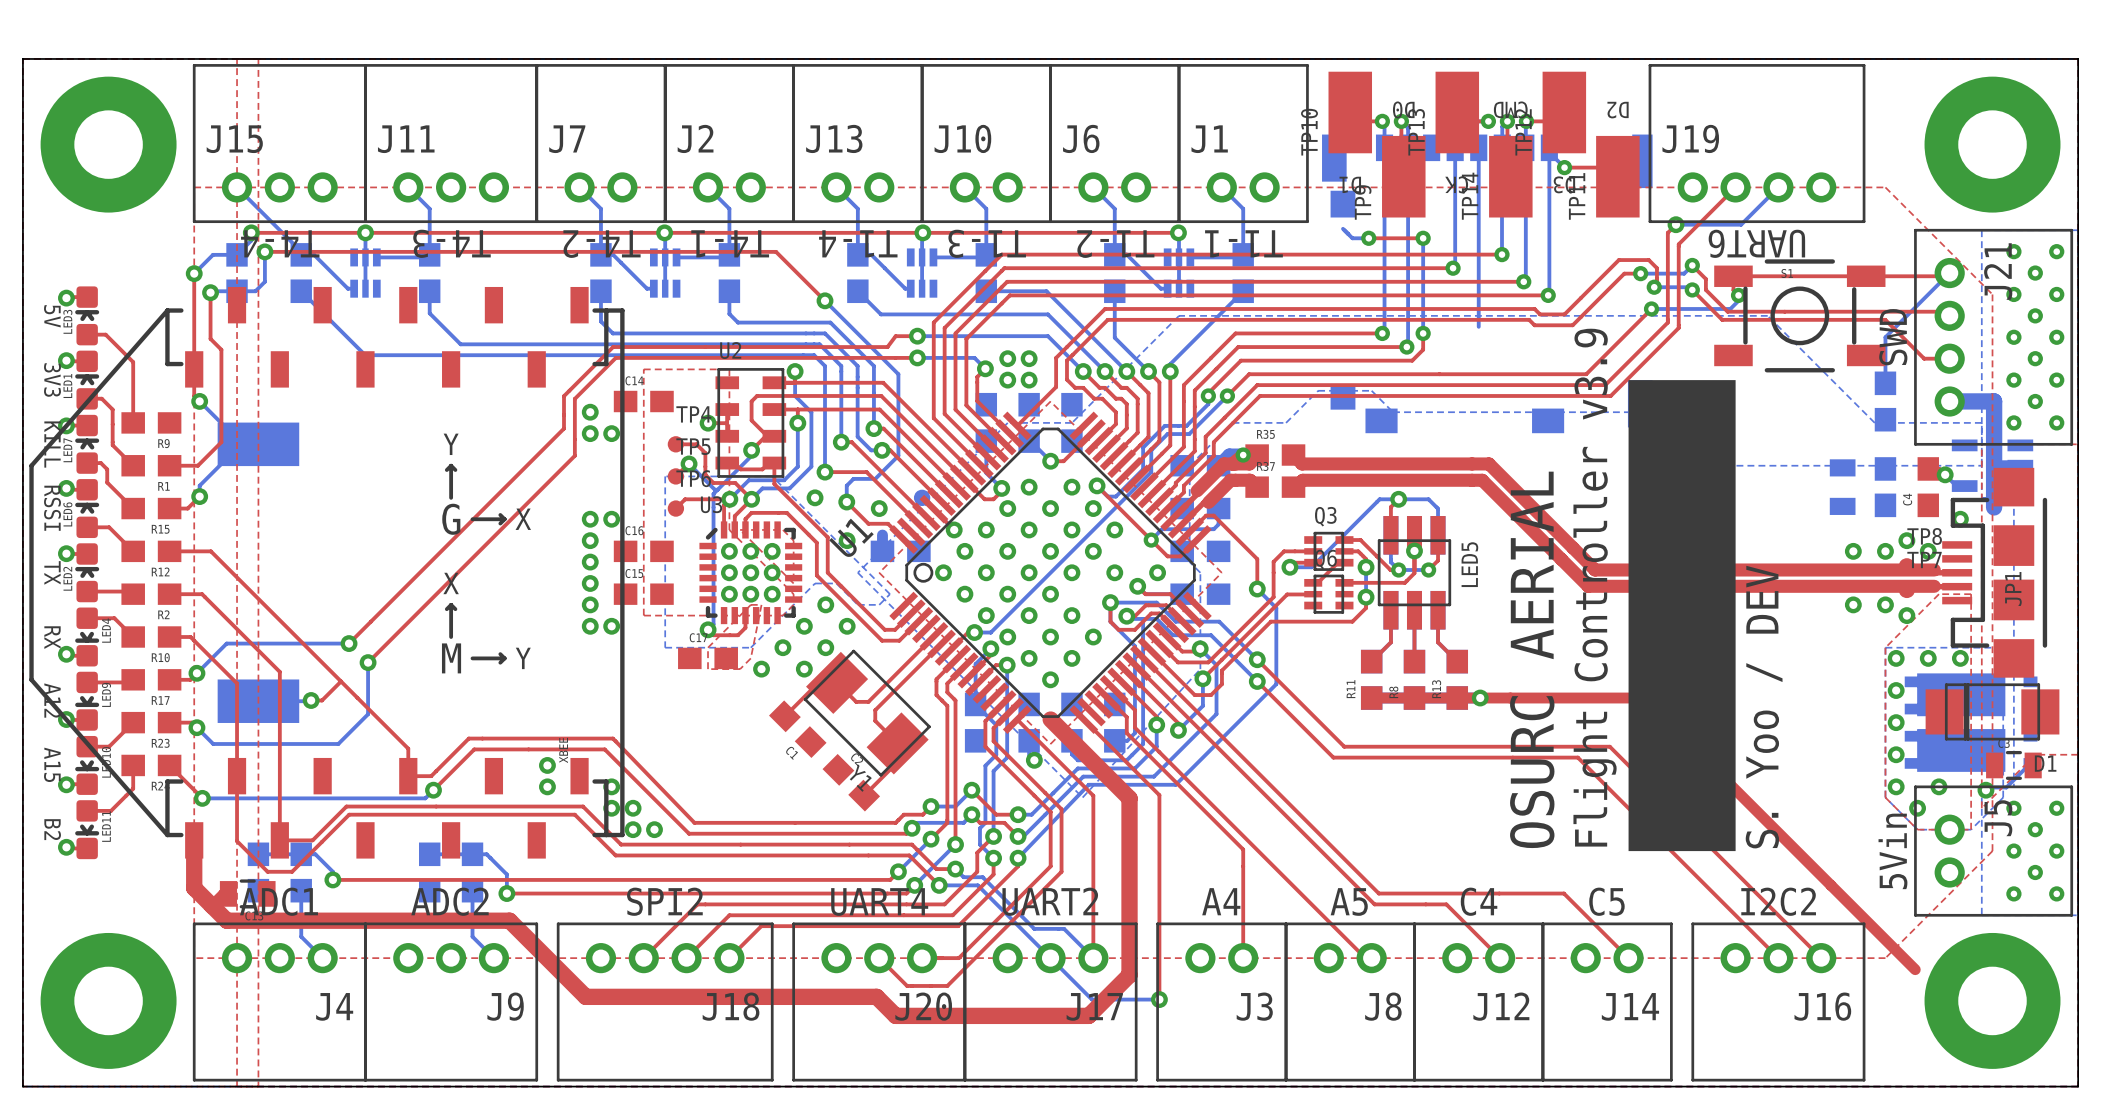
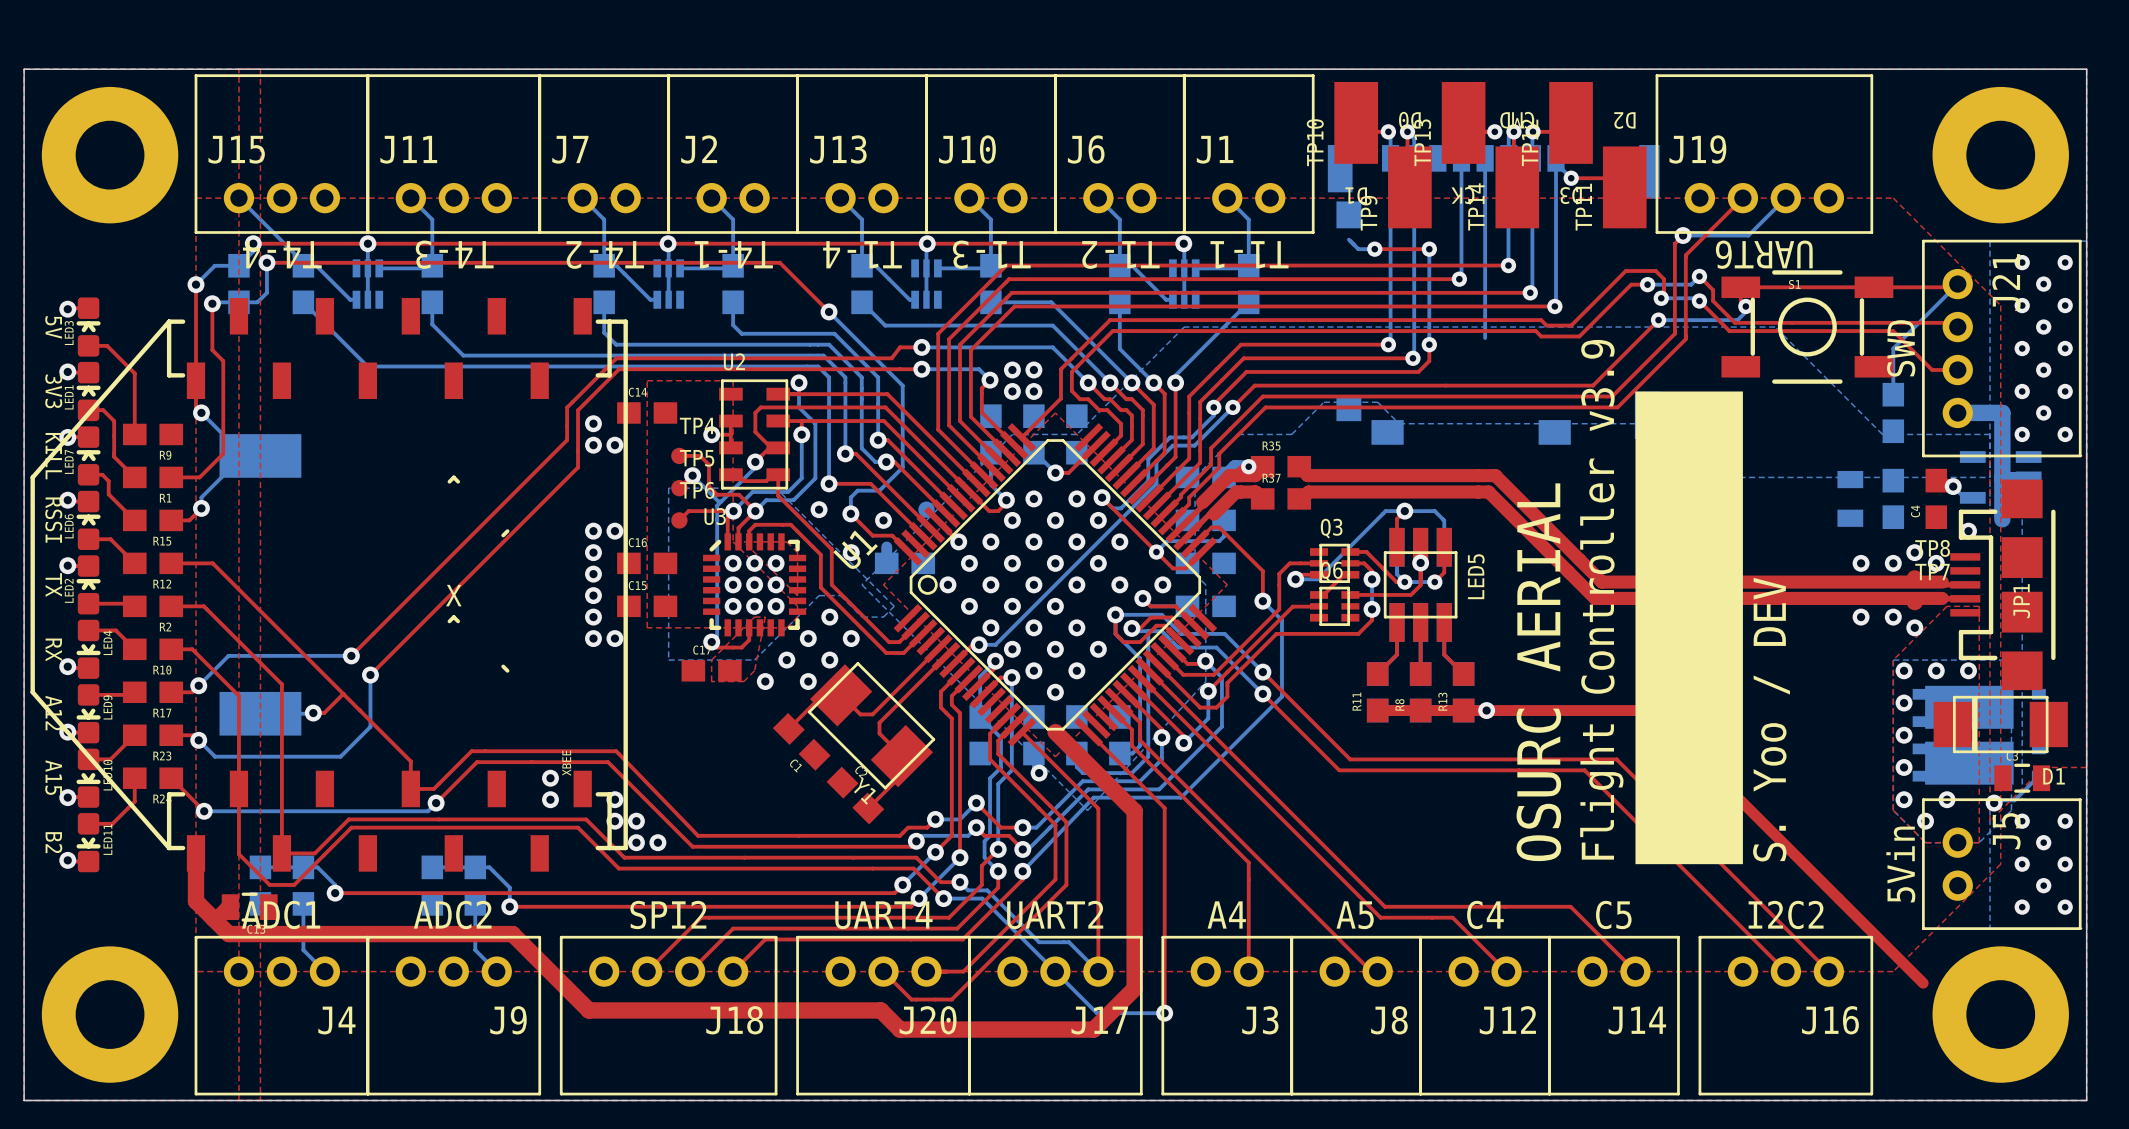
text: Y (451, 444) -> none
line: (451, 465) (451, 497) -> none
line: (500, 514) (504, 519) (472, 519) -> none
text: G (451, 519) -> none
text: X (523, 519) -> none
line: (451, 604) (451, 637) -> none
text: M (451, 658) -> none
line: (472, 658) (504, 658) (500, 662) -> none
text: Y (523, 658) -> none

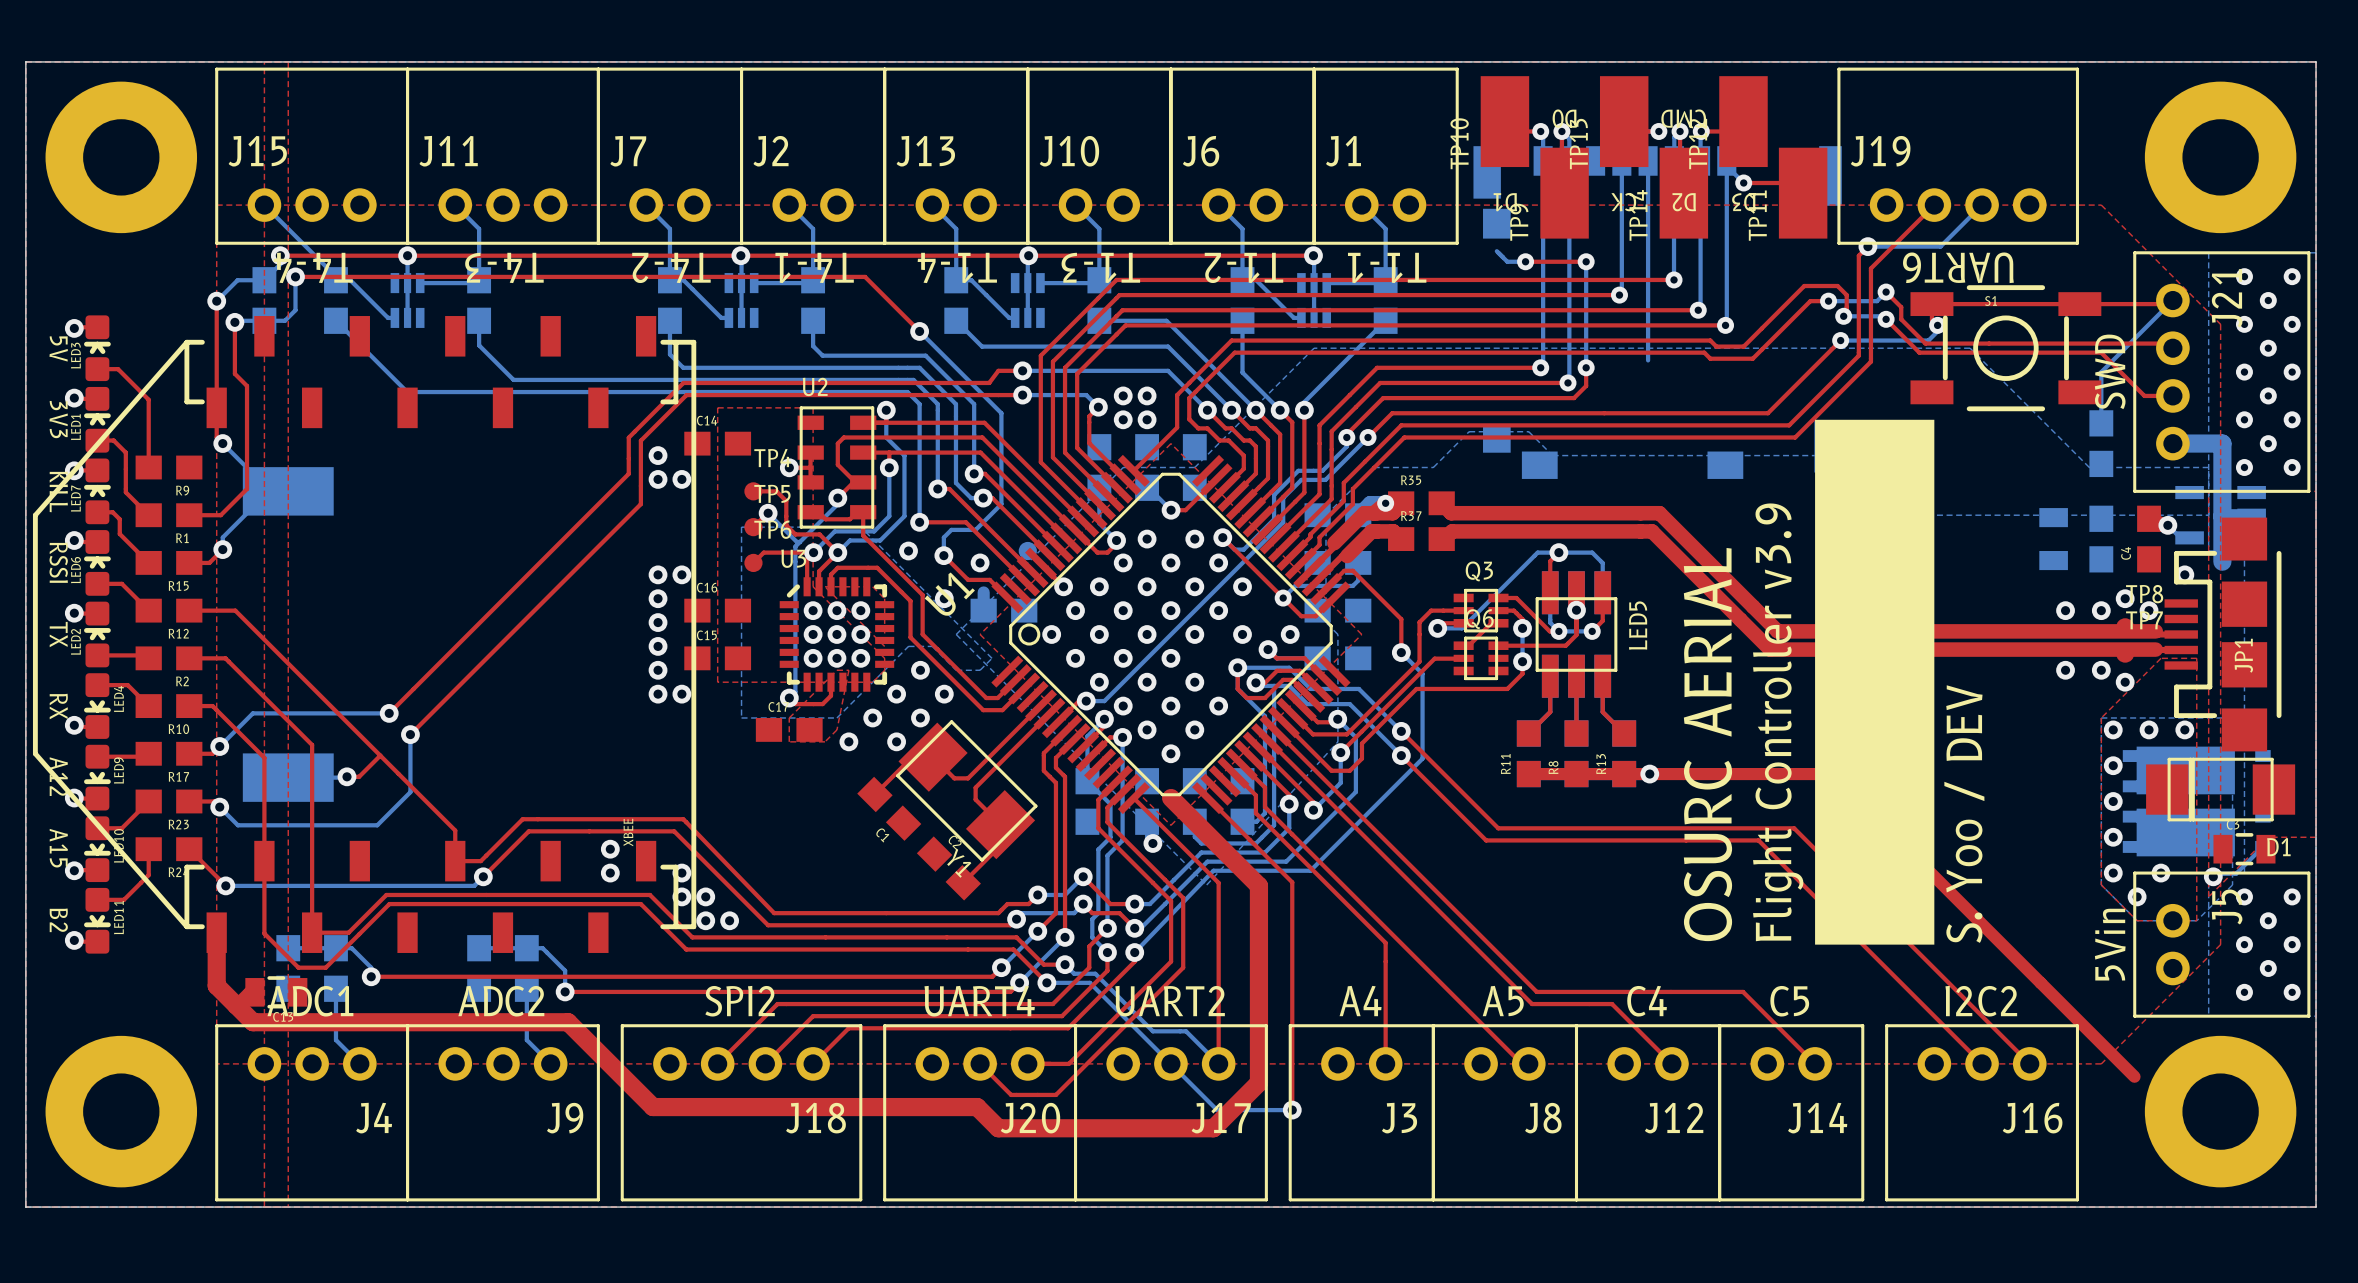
text position: D2 (1624, 120) -> D2 (1684, 202)
line: (449, 481) (453, 477) (458, 481) -> none
line: (507, 531) (503, 535) -> none
text: X (453, 595) -> none
line: (449, 621) (453, 617) (458, 621) -> none
line: (503, 666) (507, 670) -> none

